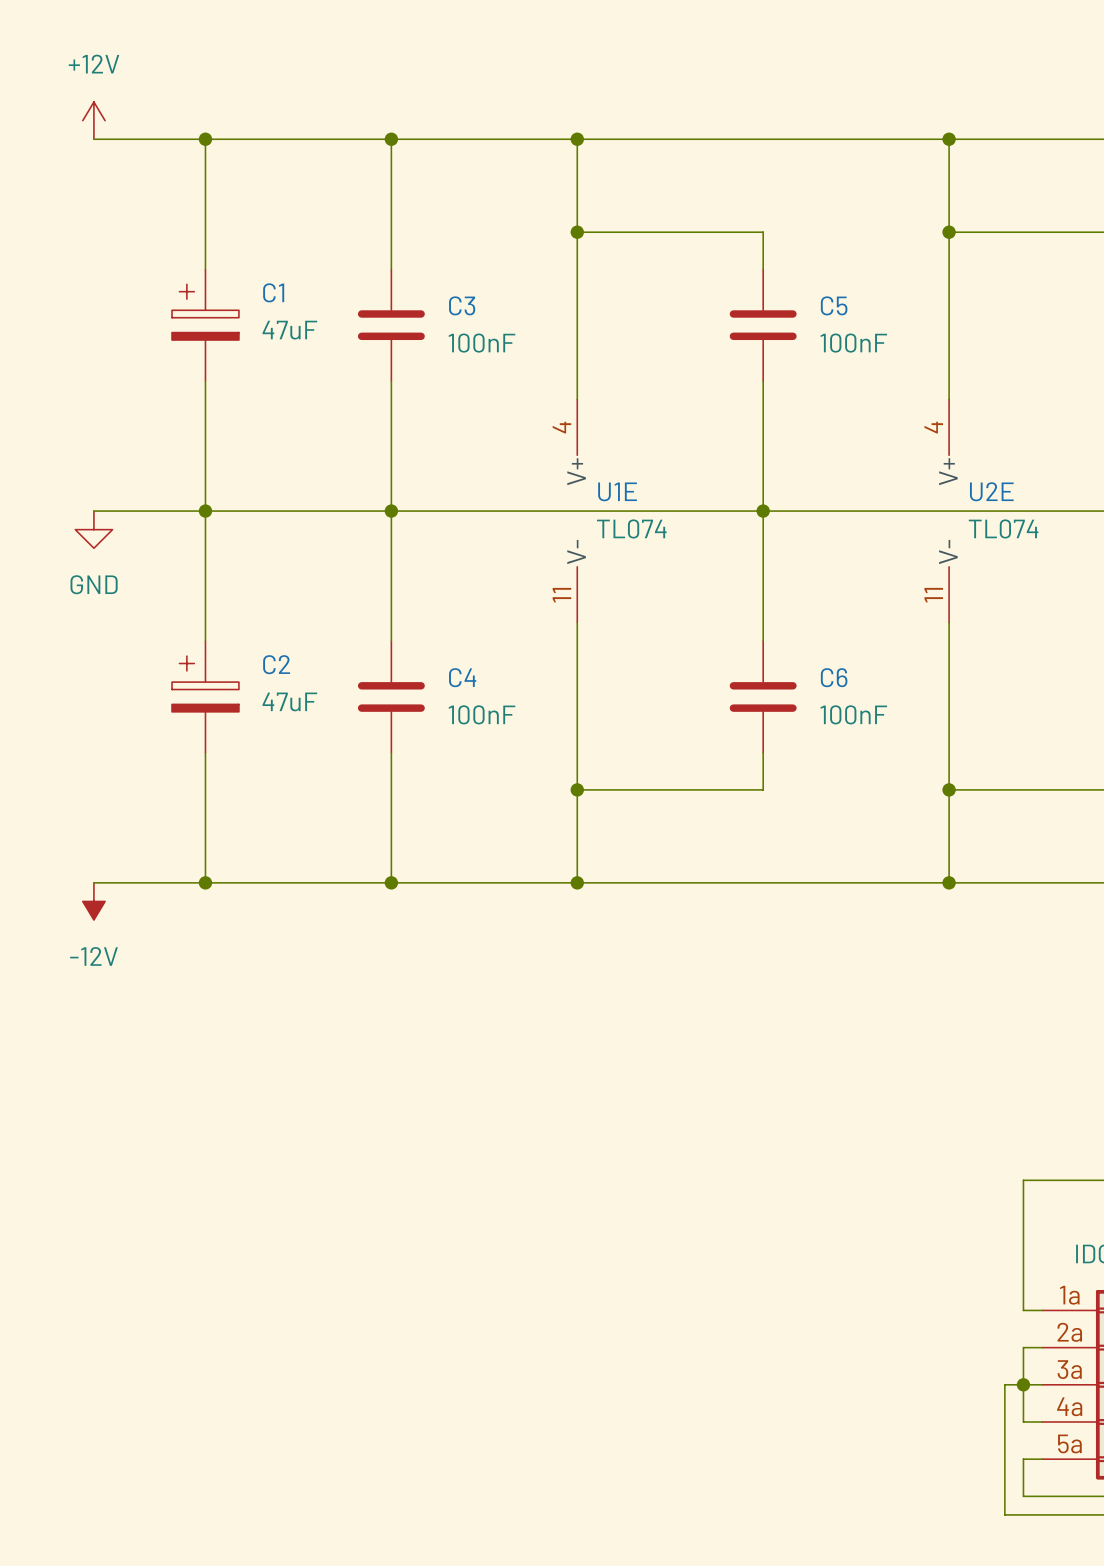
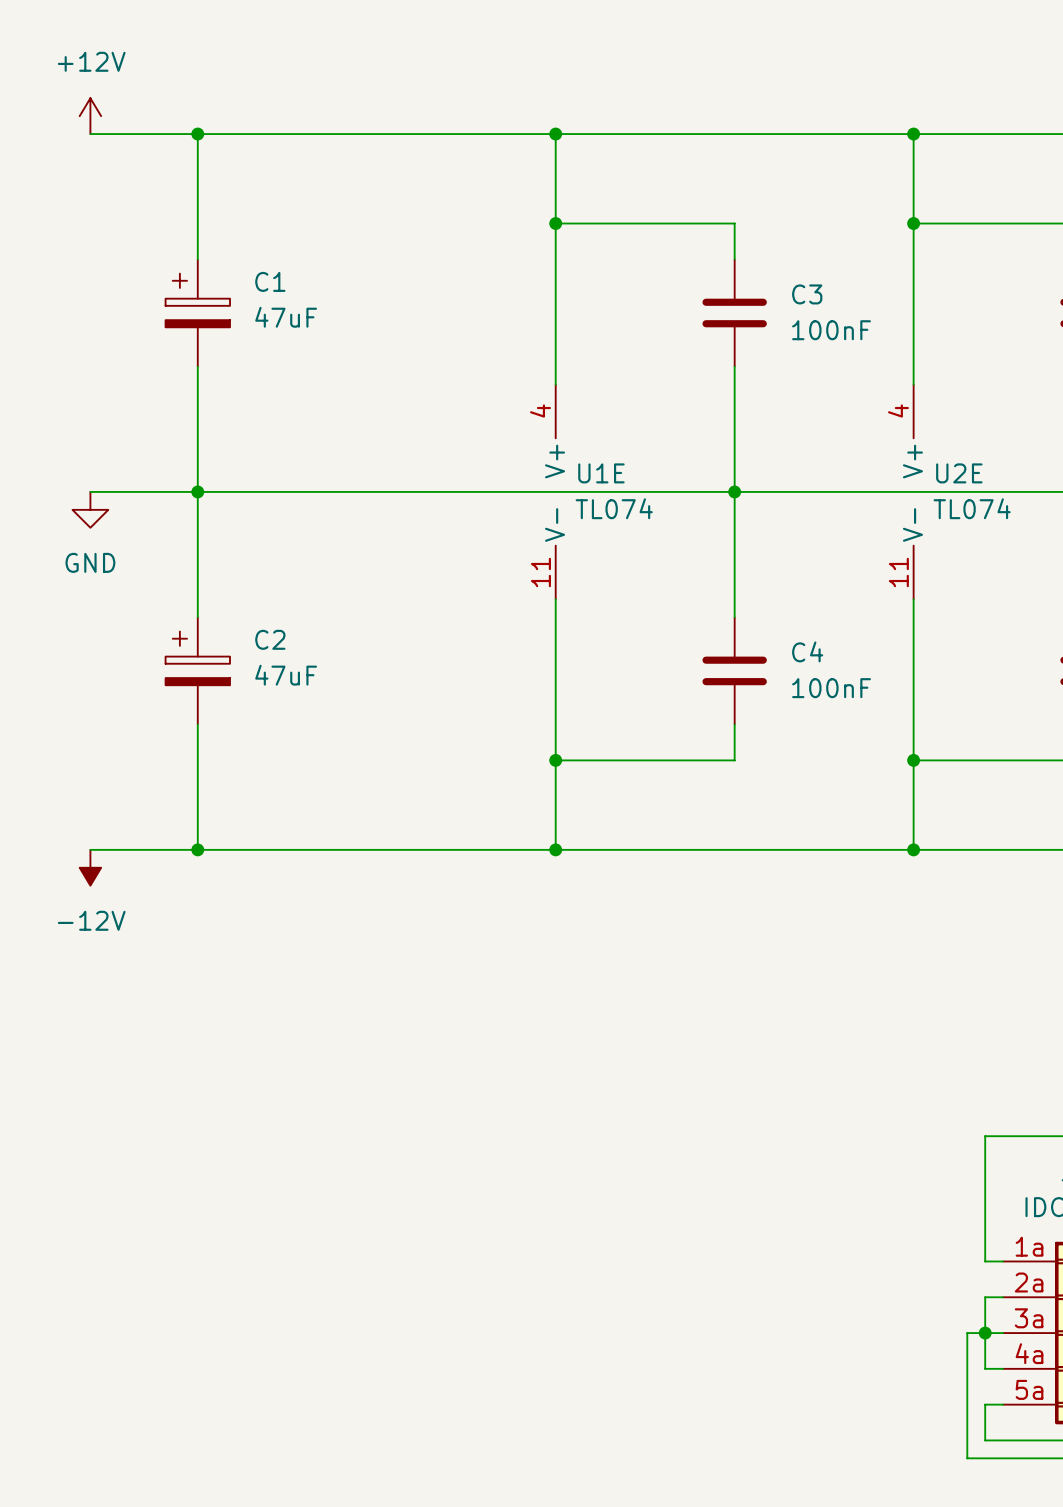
wire: (391, 139) (391, 269) -> none
junction: (391, 139) -> none
C5 name: C5 (834, 305) -> C3 (807, 294)
C3: 100nF (391, 325) -> none
wire: (391, 380) (391, 641) -> none
junction: (391, 511) -> none
C6 name: C6 (834, 677) -> C4 (807, 651)
C4: 100nF (391, 696) -> none
wire: (391, 752) (391, 882) -> none
junction: (391, 882) -> none

